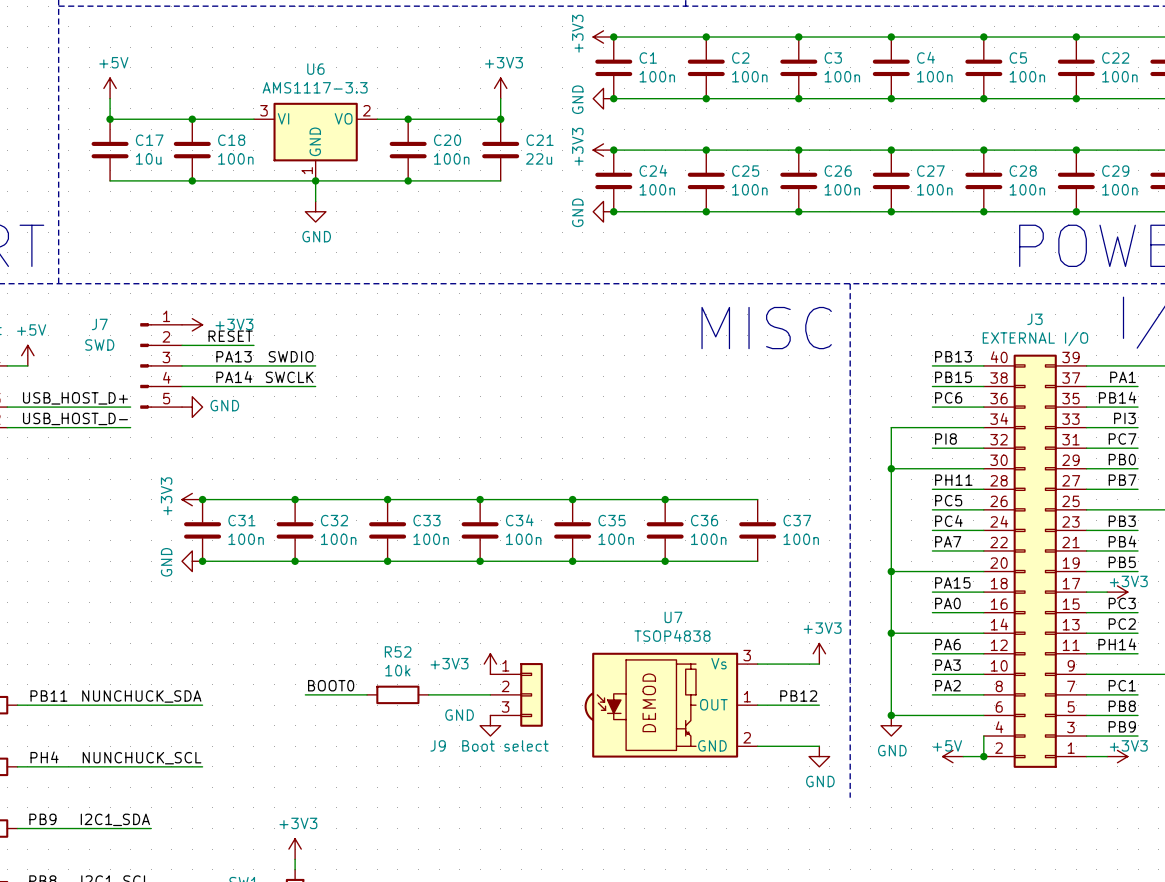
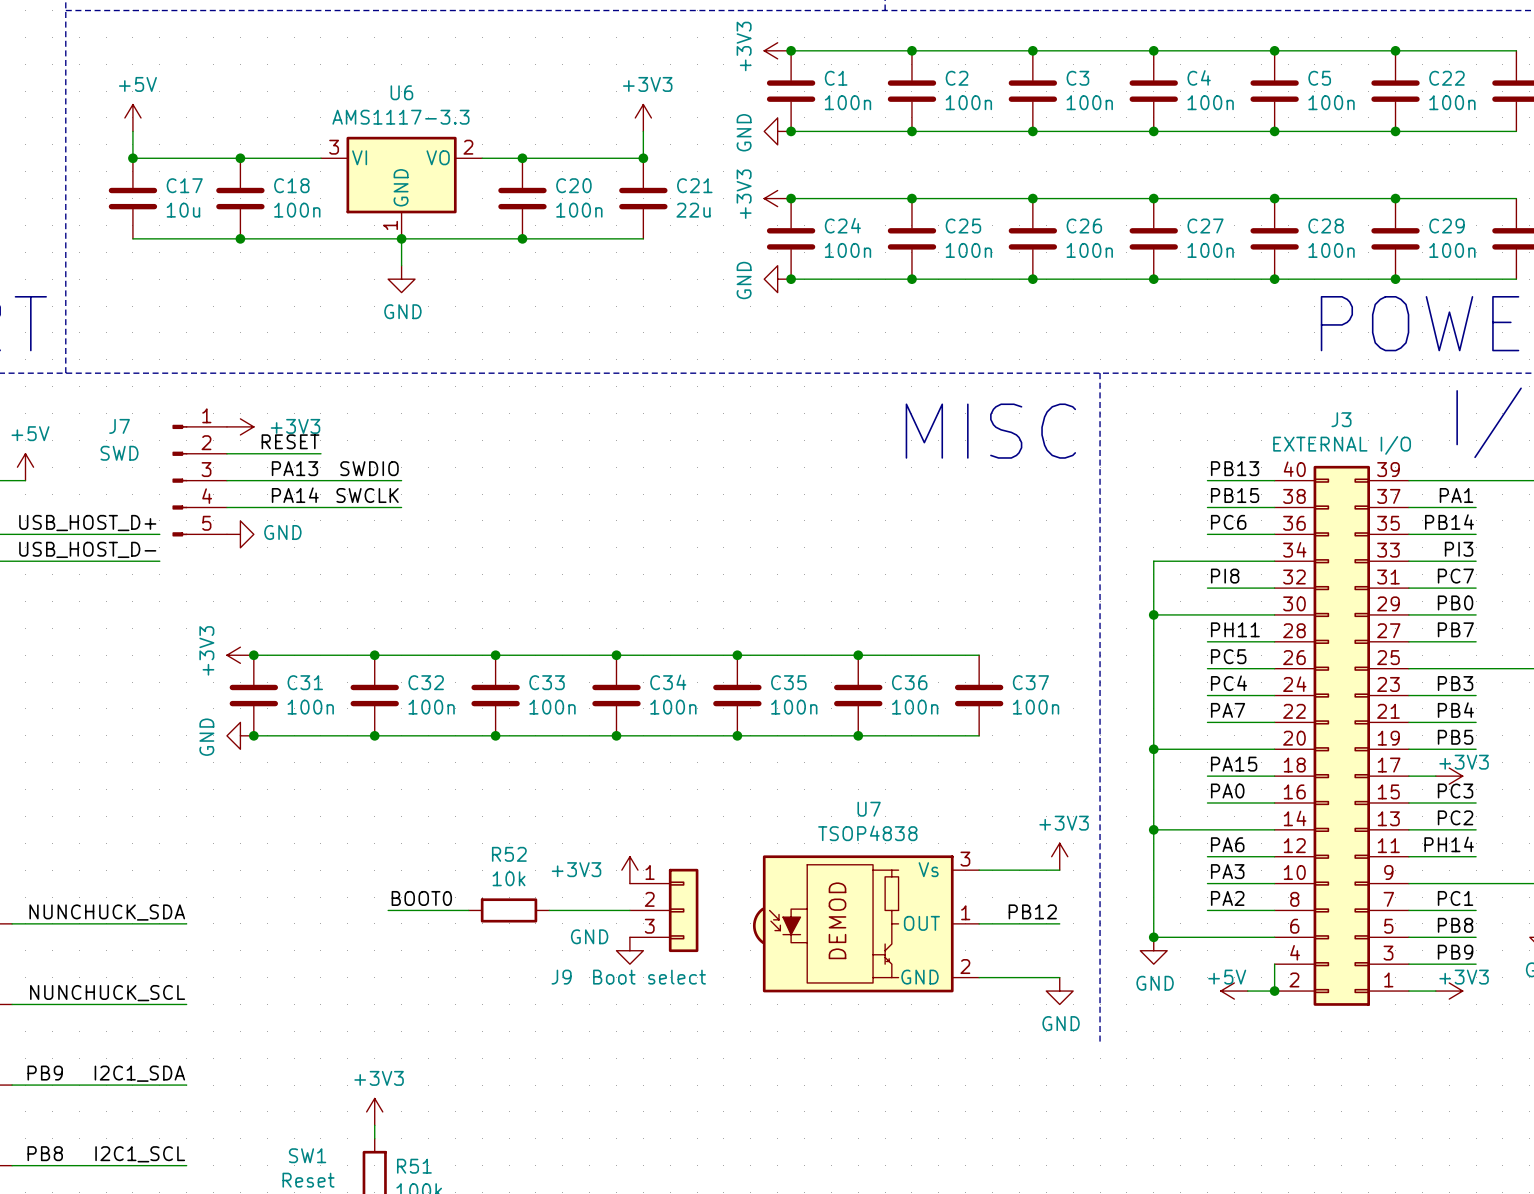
label: PB11 (48, 696) -> none
label position: NUNCHUCK_SDA (141, 696) -> NUNCHUCK_SDA (107, 912)
wire: (151, 705) (202, 705) -> none
label: PH4 (44, 757) -> none
label position: NUNCHUCK_SCL (142, 758) -> NUNCHUCK_SCL (107, 993)
wire: (151, 766) (202, 766) -> none

